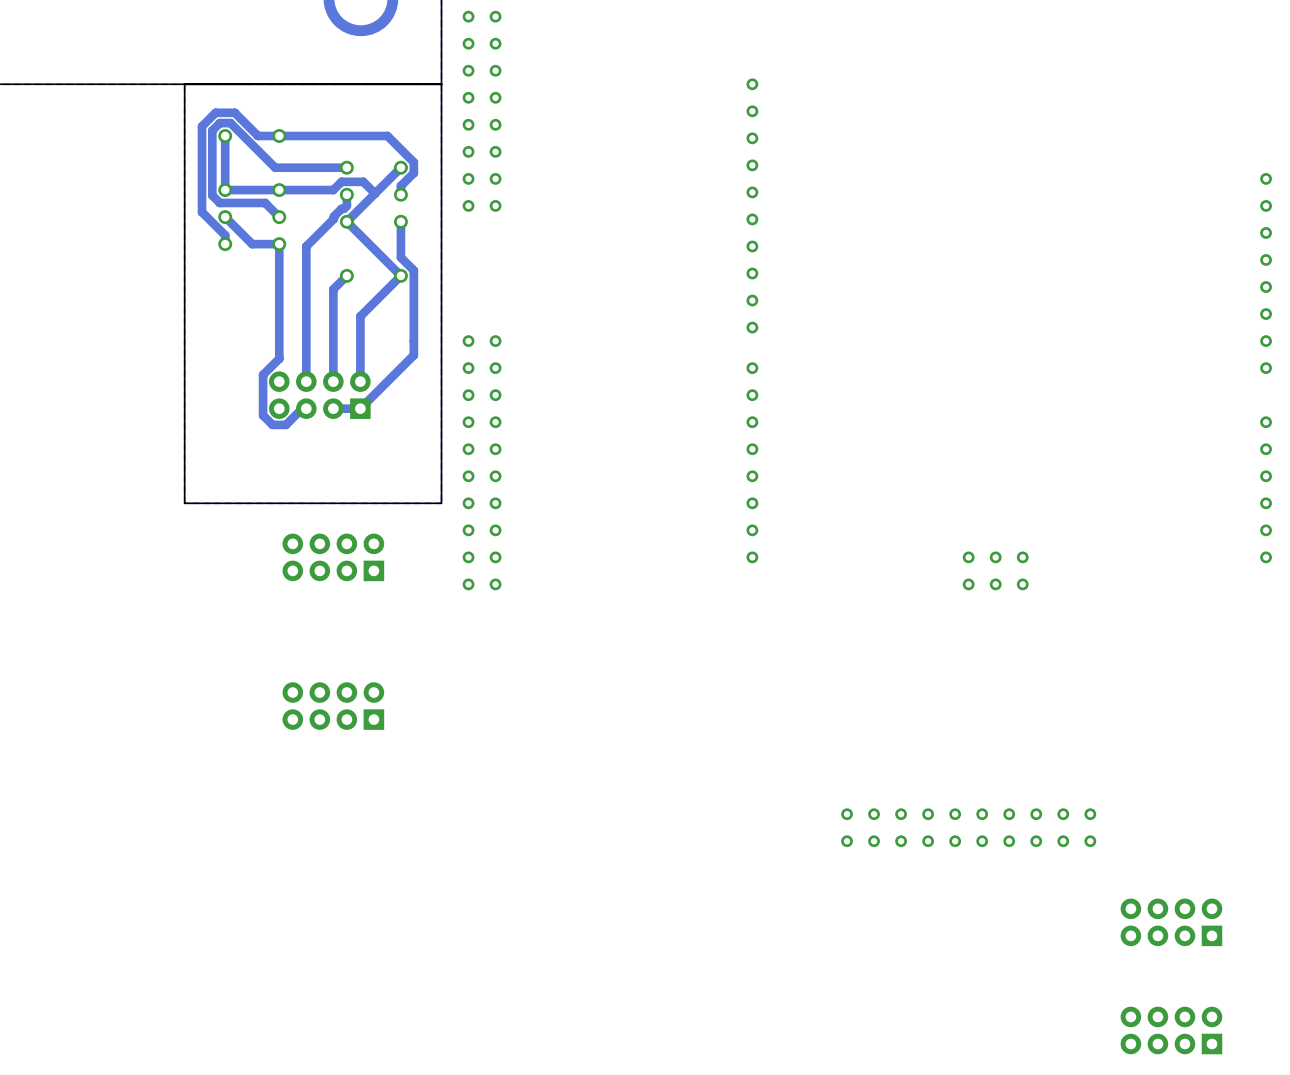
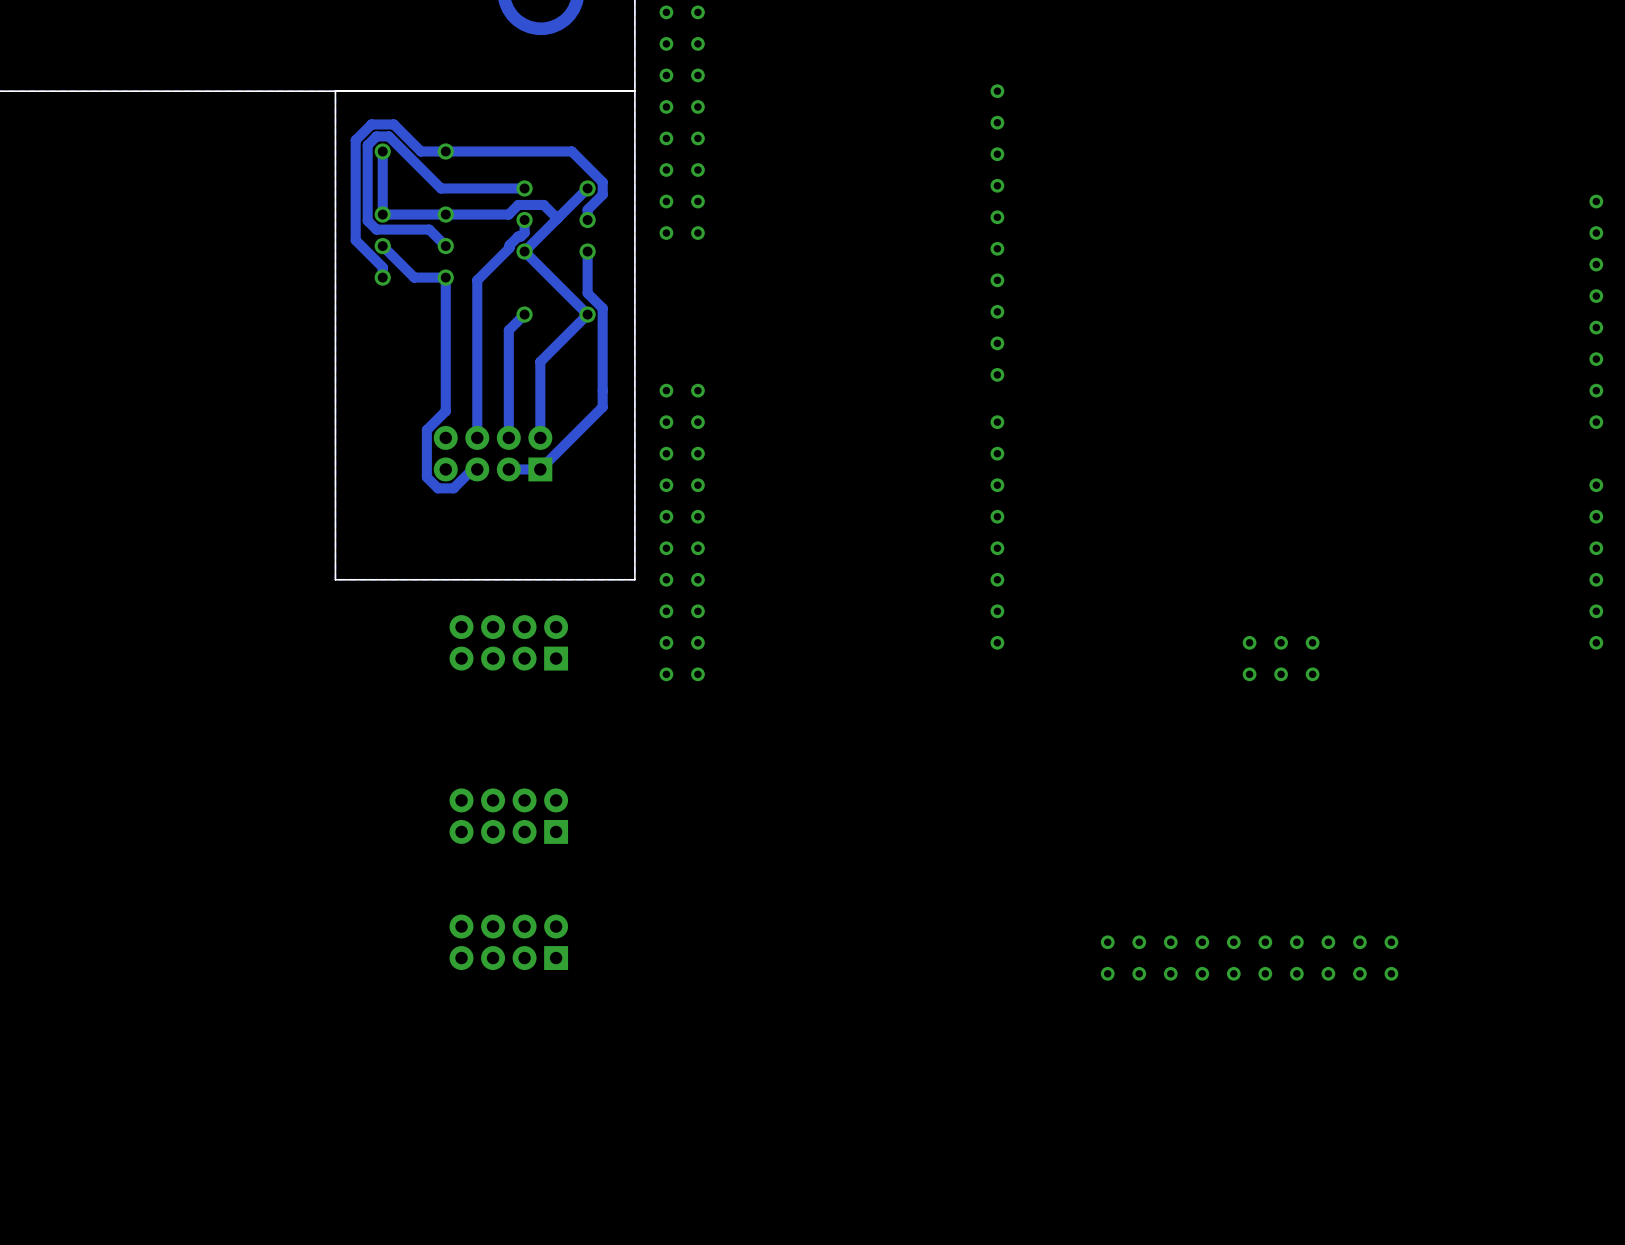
part: none -> (508, 942)
part: (1171, 922) -> none
part: (1171, 1030) -> none

